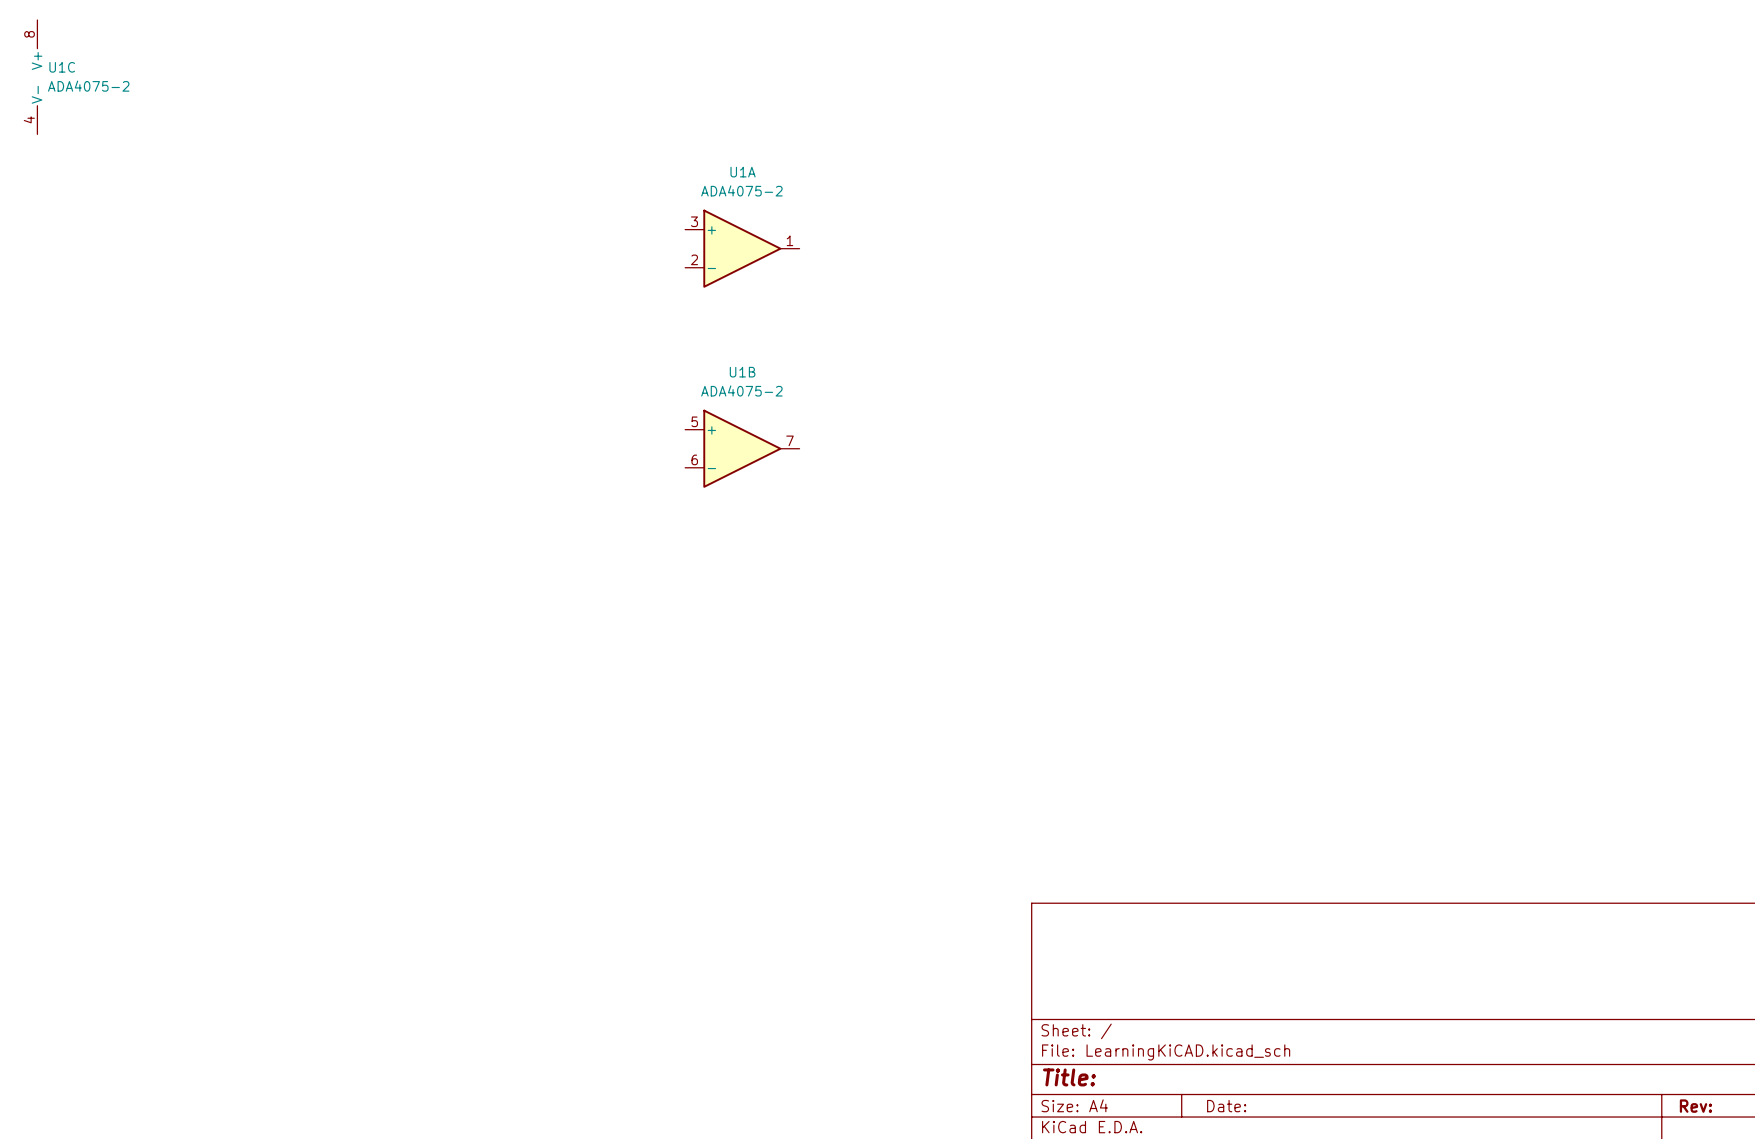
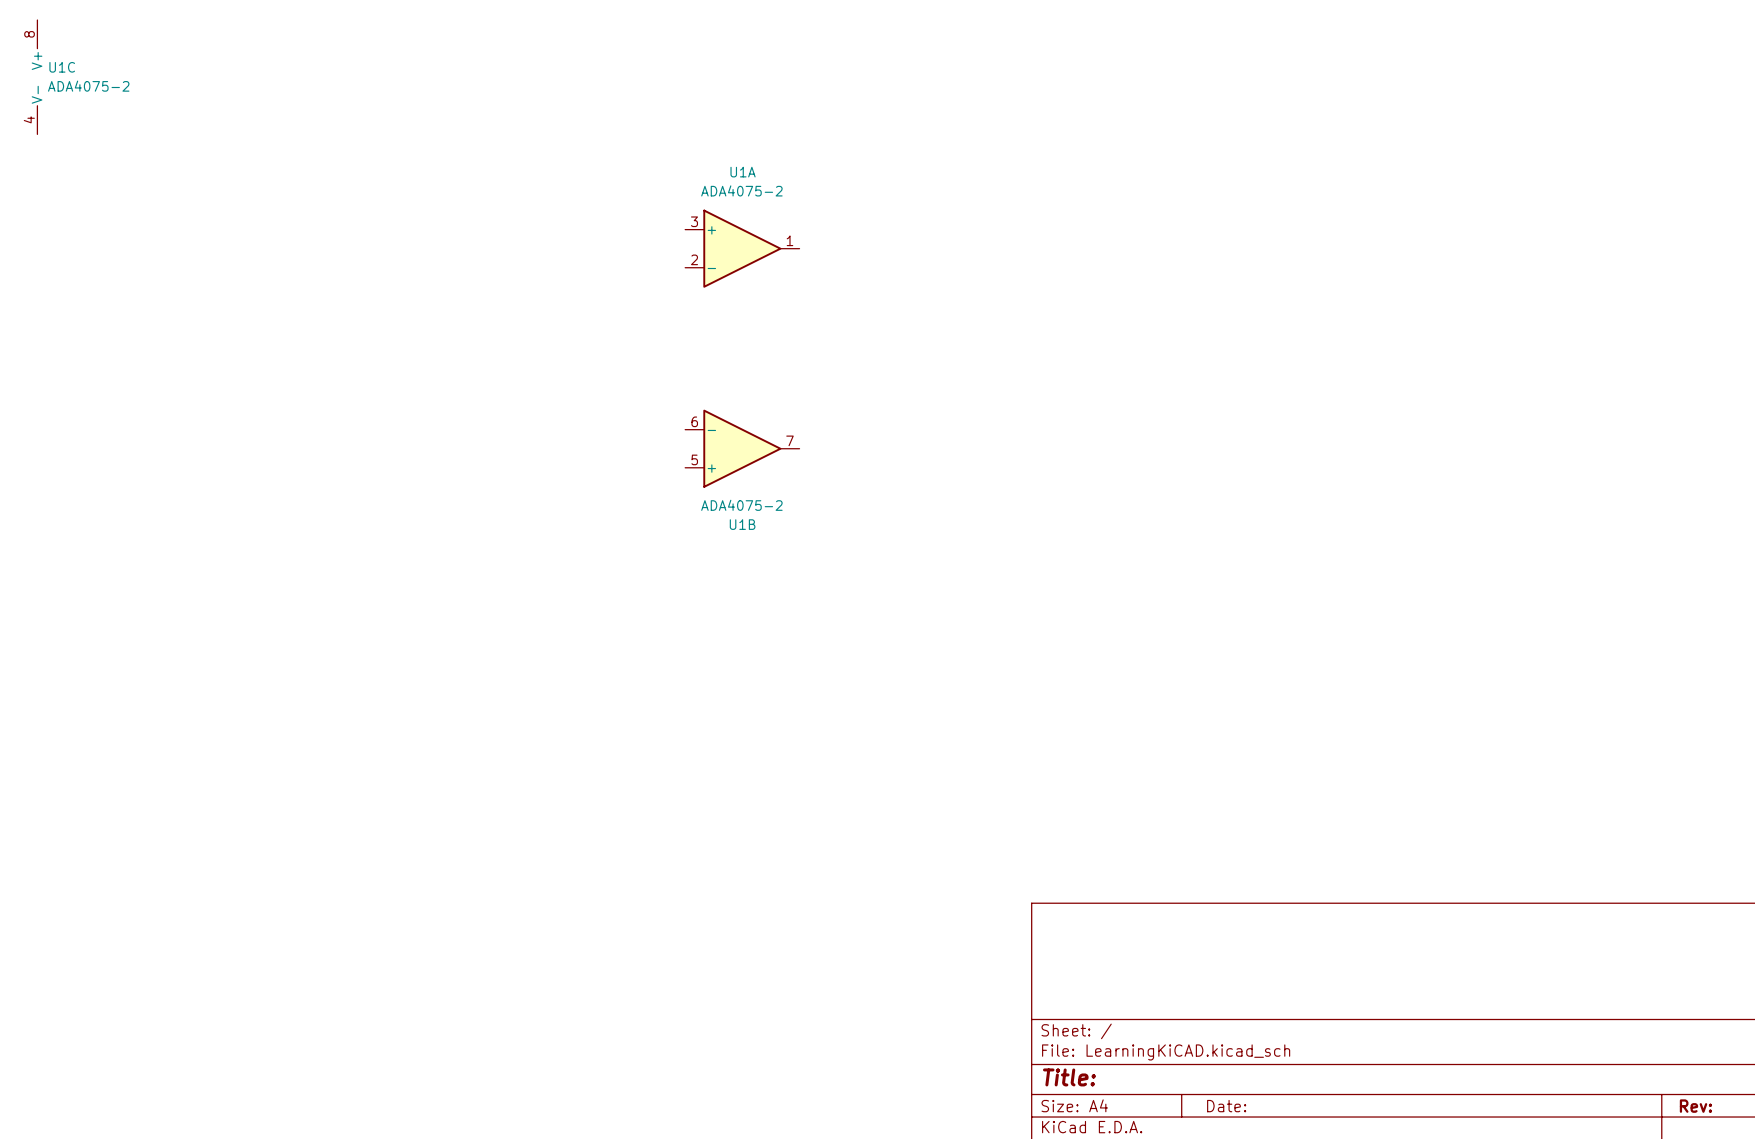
U1B flip: as is (742, 448) -> up-down (742, 448)

